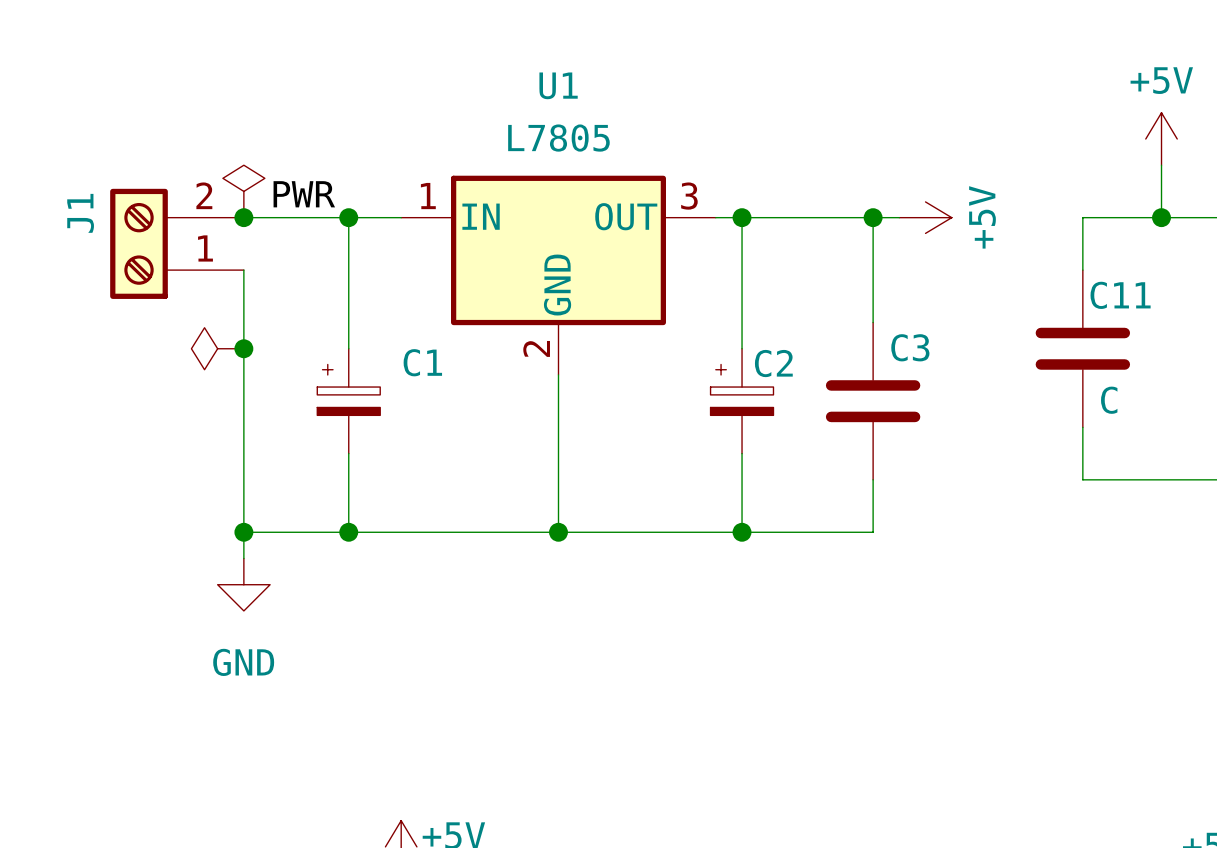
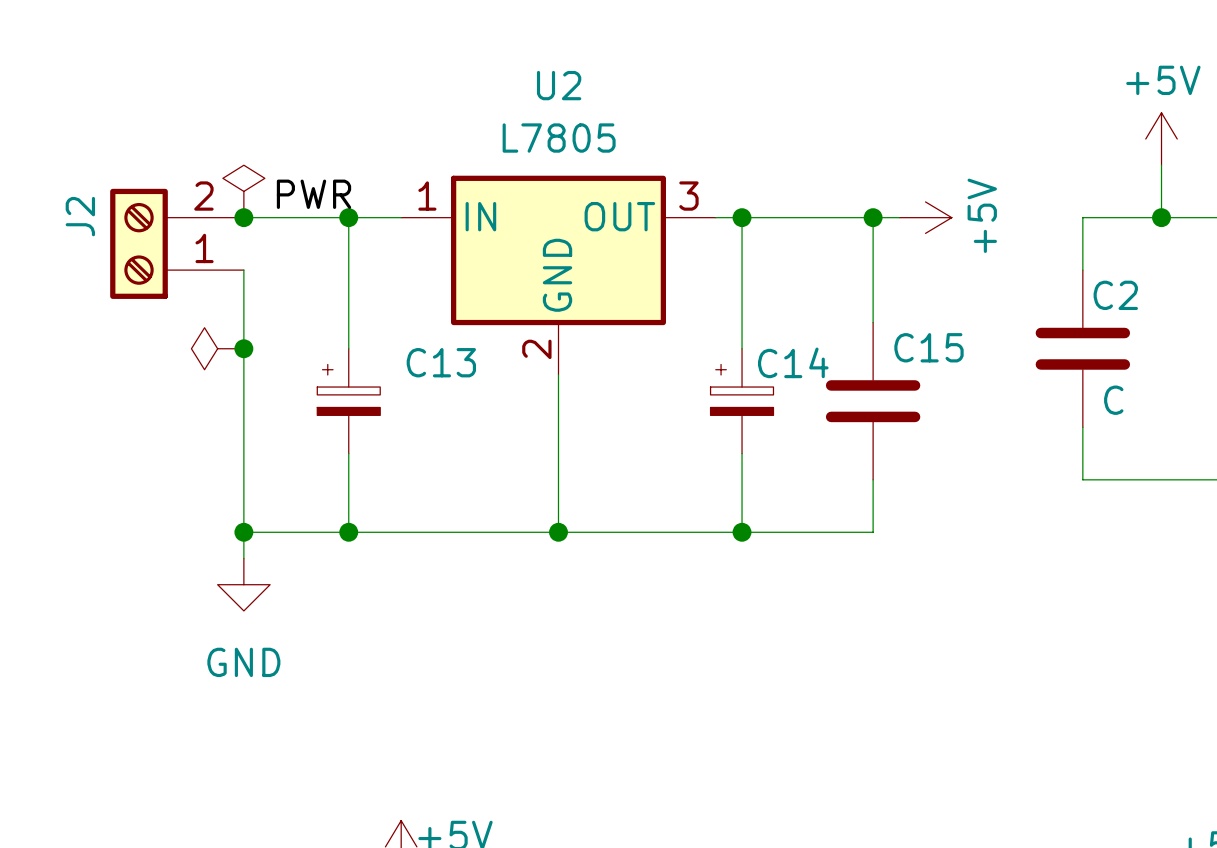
U1 name: U1 (558, 85) -> U2 (559, 85)
J1 name: J1 (80, 213) -> J2 (80, 216)
C11 name: C11 (1120, 295) -> C2 (1115, 295)
C3 name: C3 (910, 347) -> C15 (928, 347)
C1 name: C1 (422, 362) -> C13 (441, 362)
C2 name: C2 (773, 363) -> C14 (793, 362)

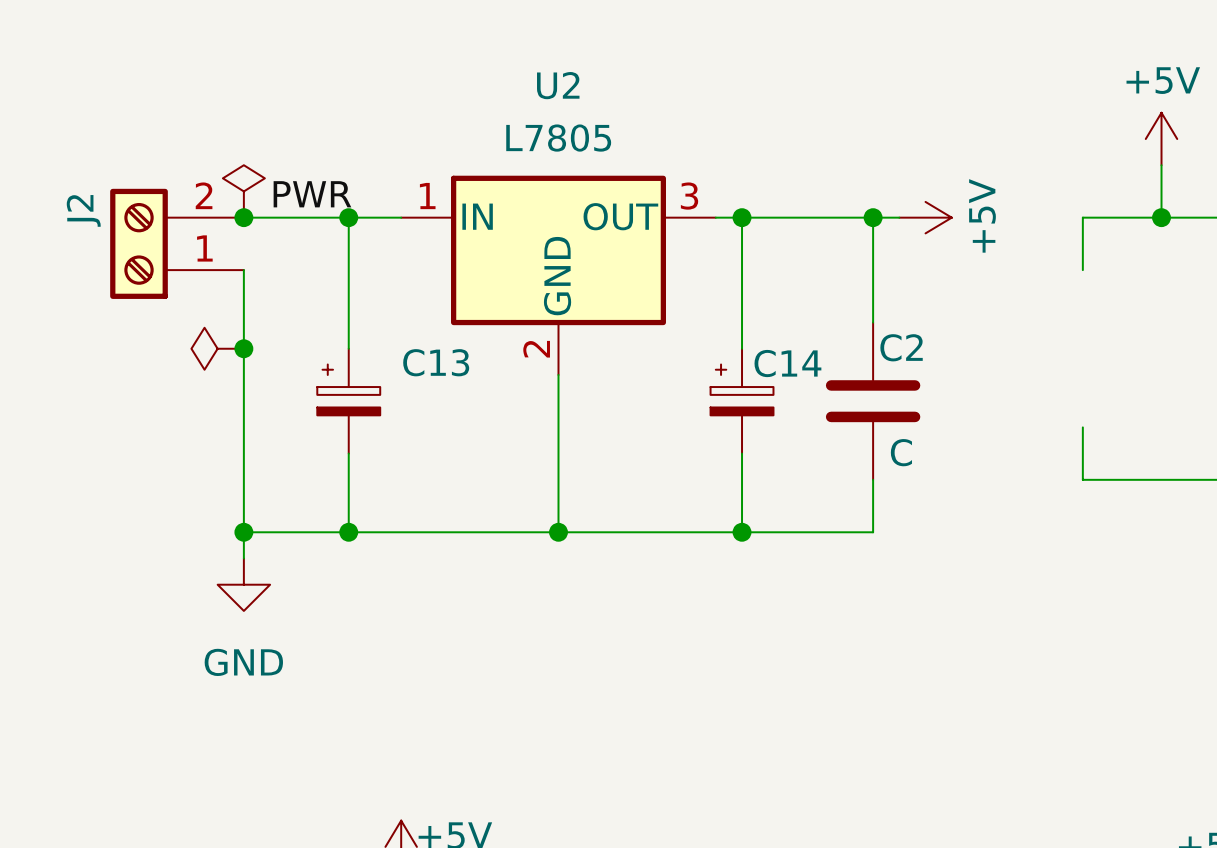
C15 name: C15 (928, 347) -> C2 (901, 347)
C2: C (1082, 348) -> none
C15 value: none -> C (901, 452)

